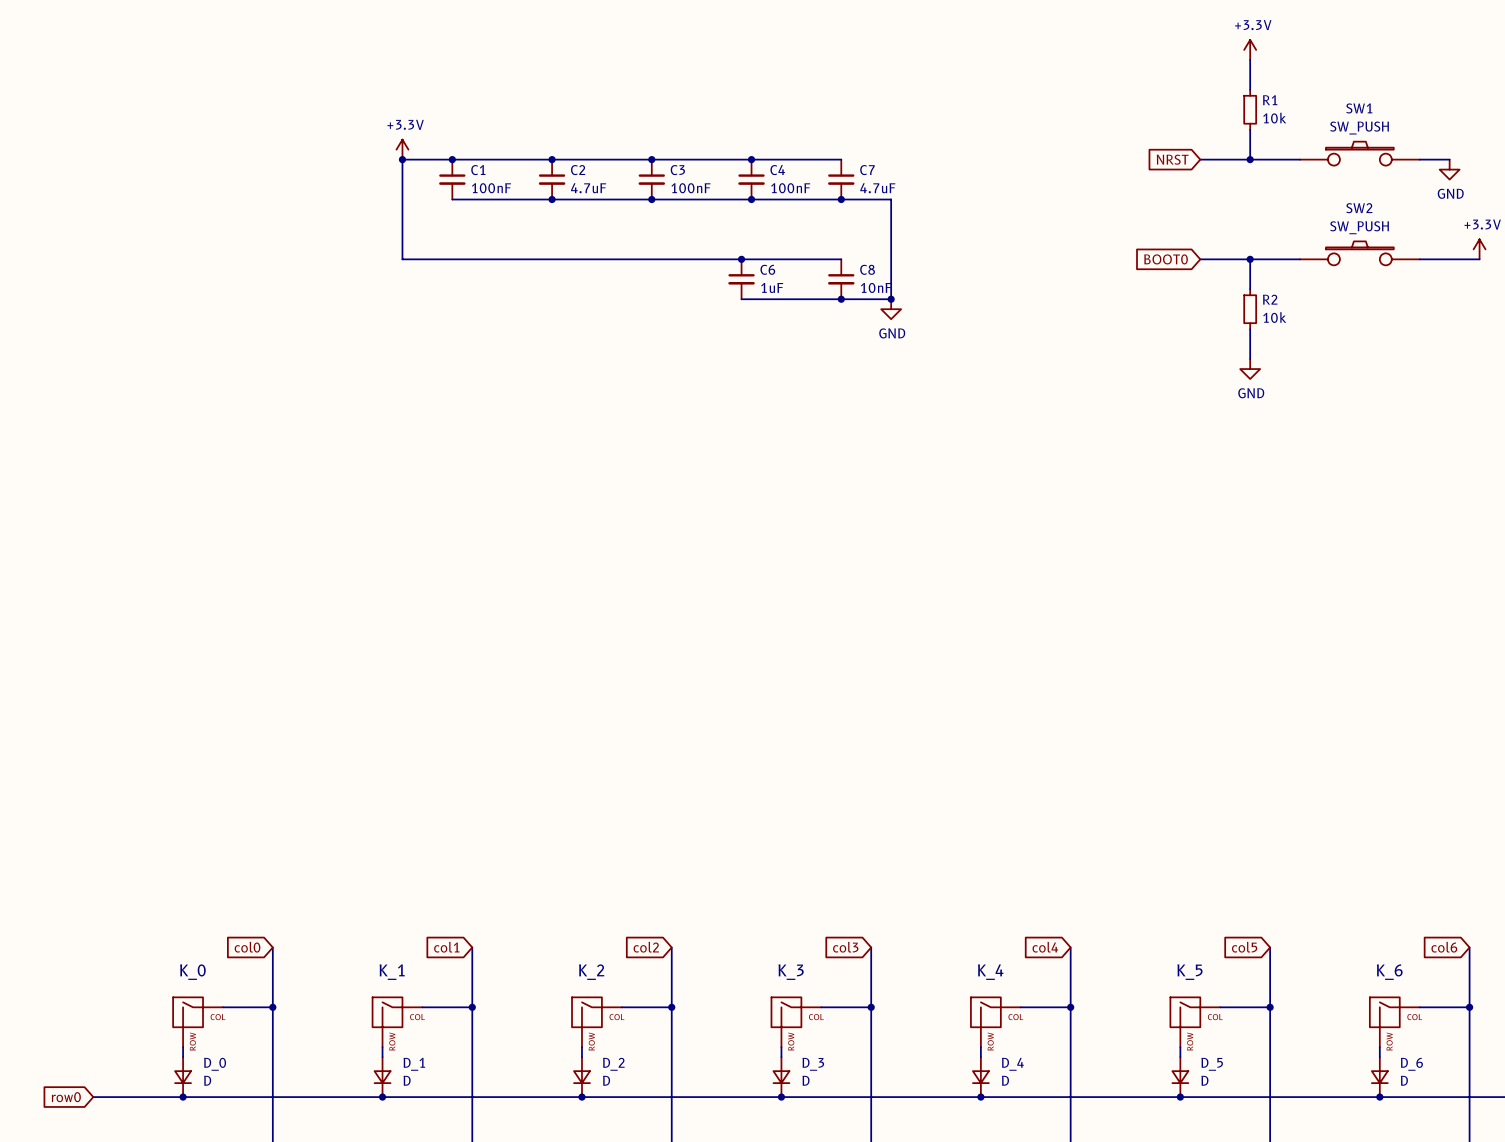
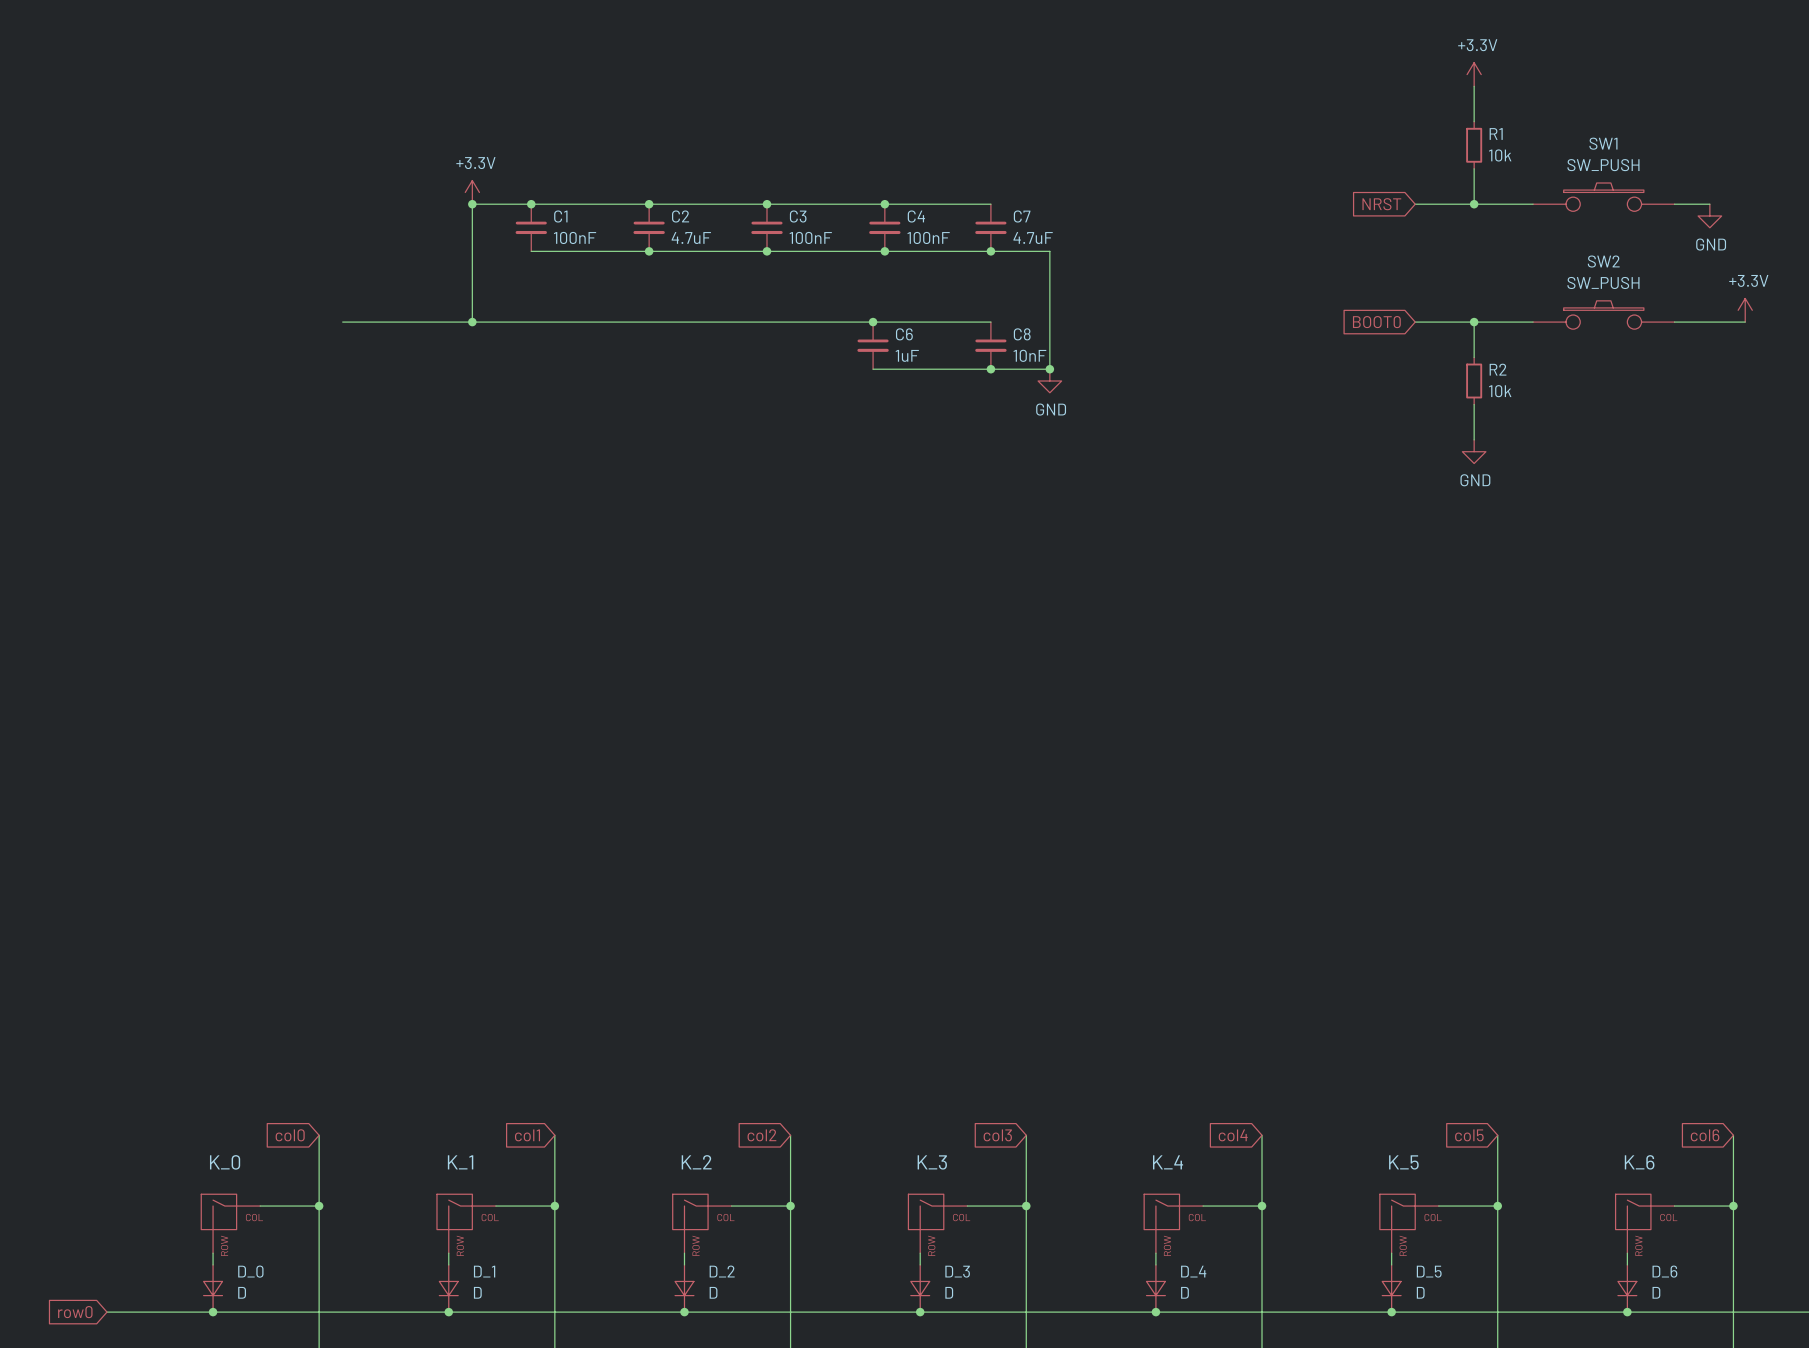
wire: none -> (342, 322) (472, 322)
junction: none -> (472, 322)

